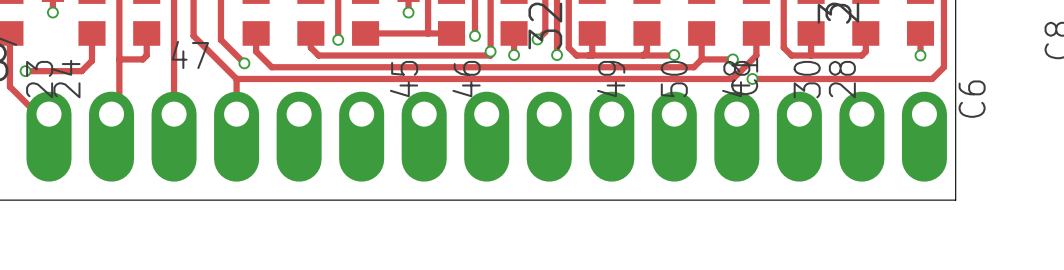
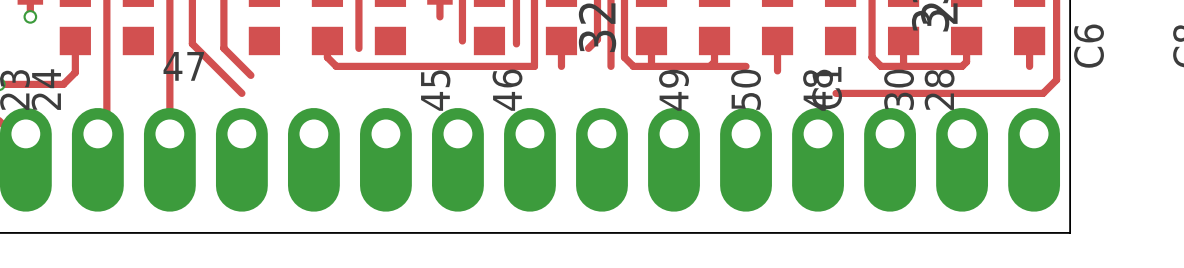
via: (408, 12) -> none
track: (256, 33) (256, 51) (271, 67) (693, 67) (701, 59) (732, 59) -> none
track: (365, 33) (451, 33) -> none
track: (756, 33) (756, 55) (732, 78) (236, 78) (236, 114) -> none
via: (474, 35) -> none
track: (146, 39) (146, 55) (142, 59) (119, 59) -> none
via: (338, 39) -> none
via: (537, 39) -> none
via: (490, 51) -> none
via: (514, 55) -> none
via: (557, 55) -> none
via: (674, 55) -> none
via: (920, 55) -> none
via: (732, 59) -> none
via: (244, 63) -> none
via: (752, 78) -> none
text position: C6 (972, 99) -> C6 (1089, 46)

